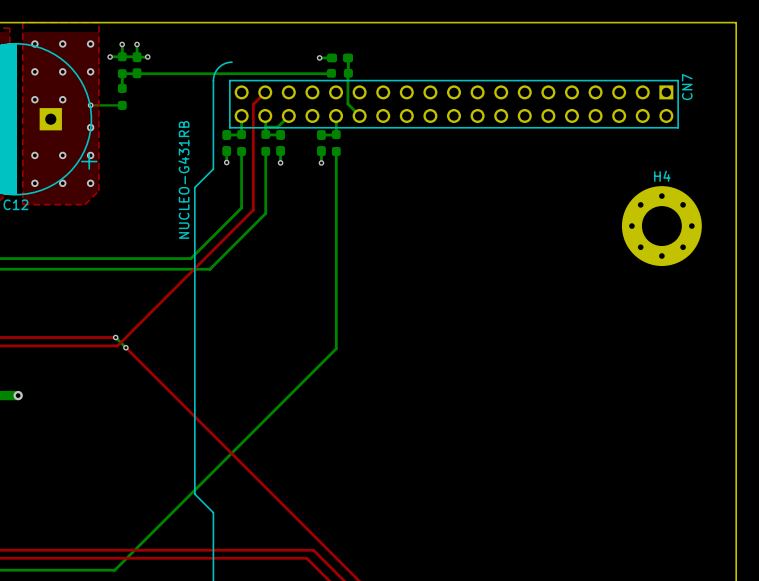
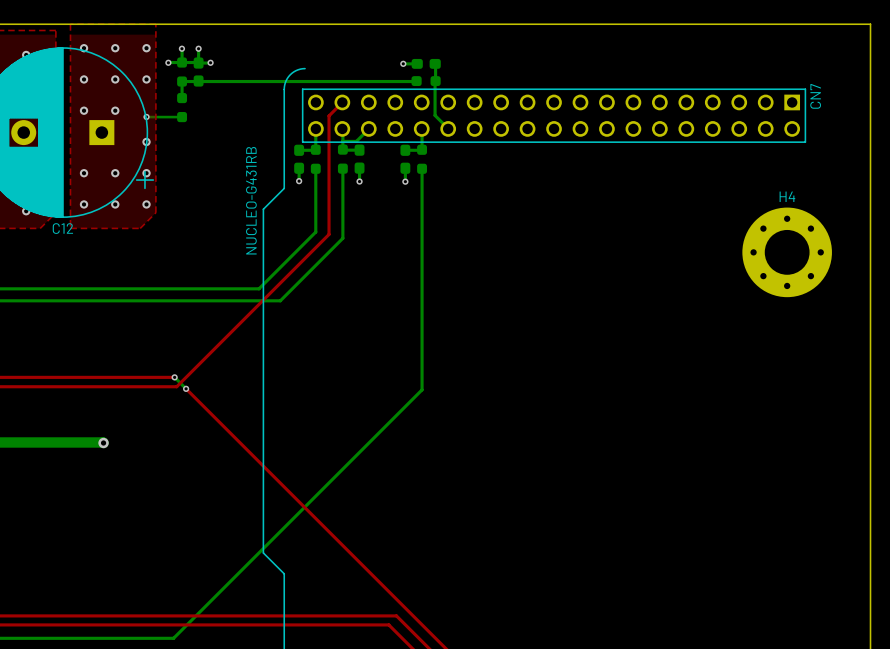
via position: (18, 395) -> (103, 443)

